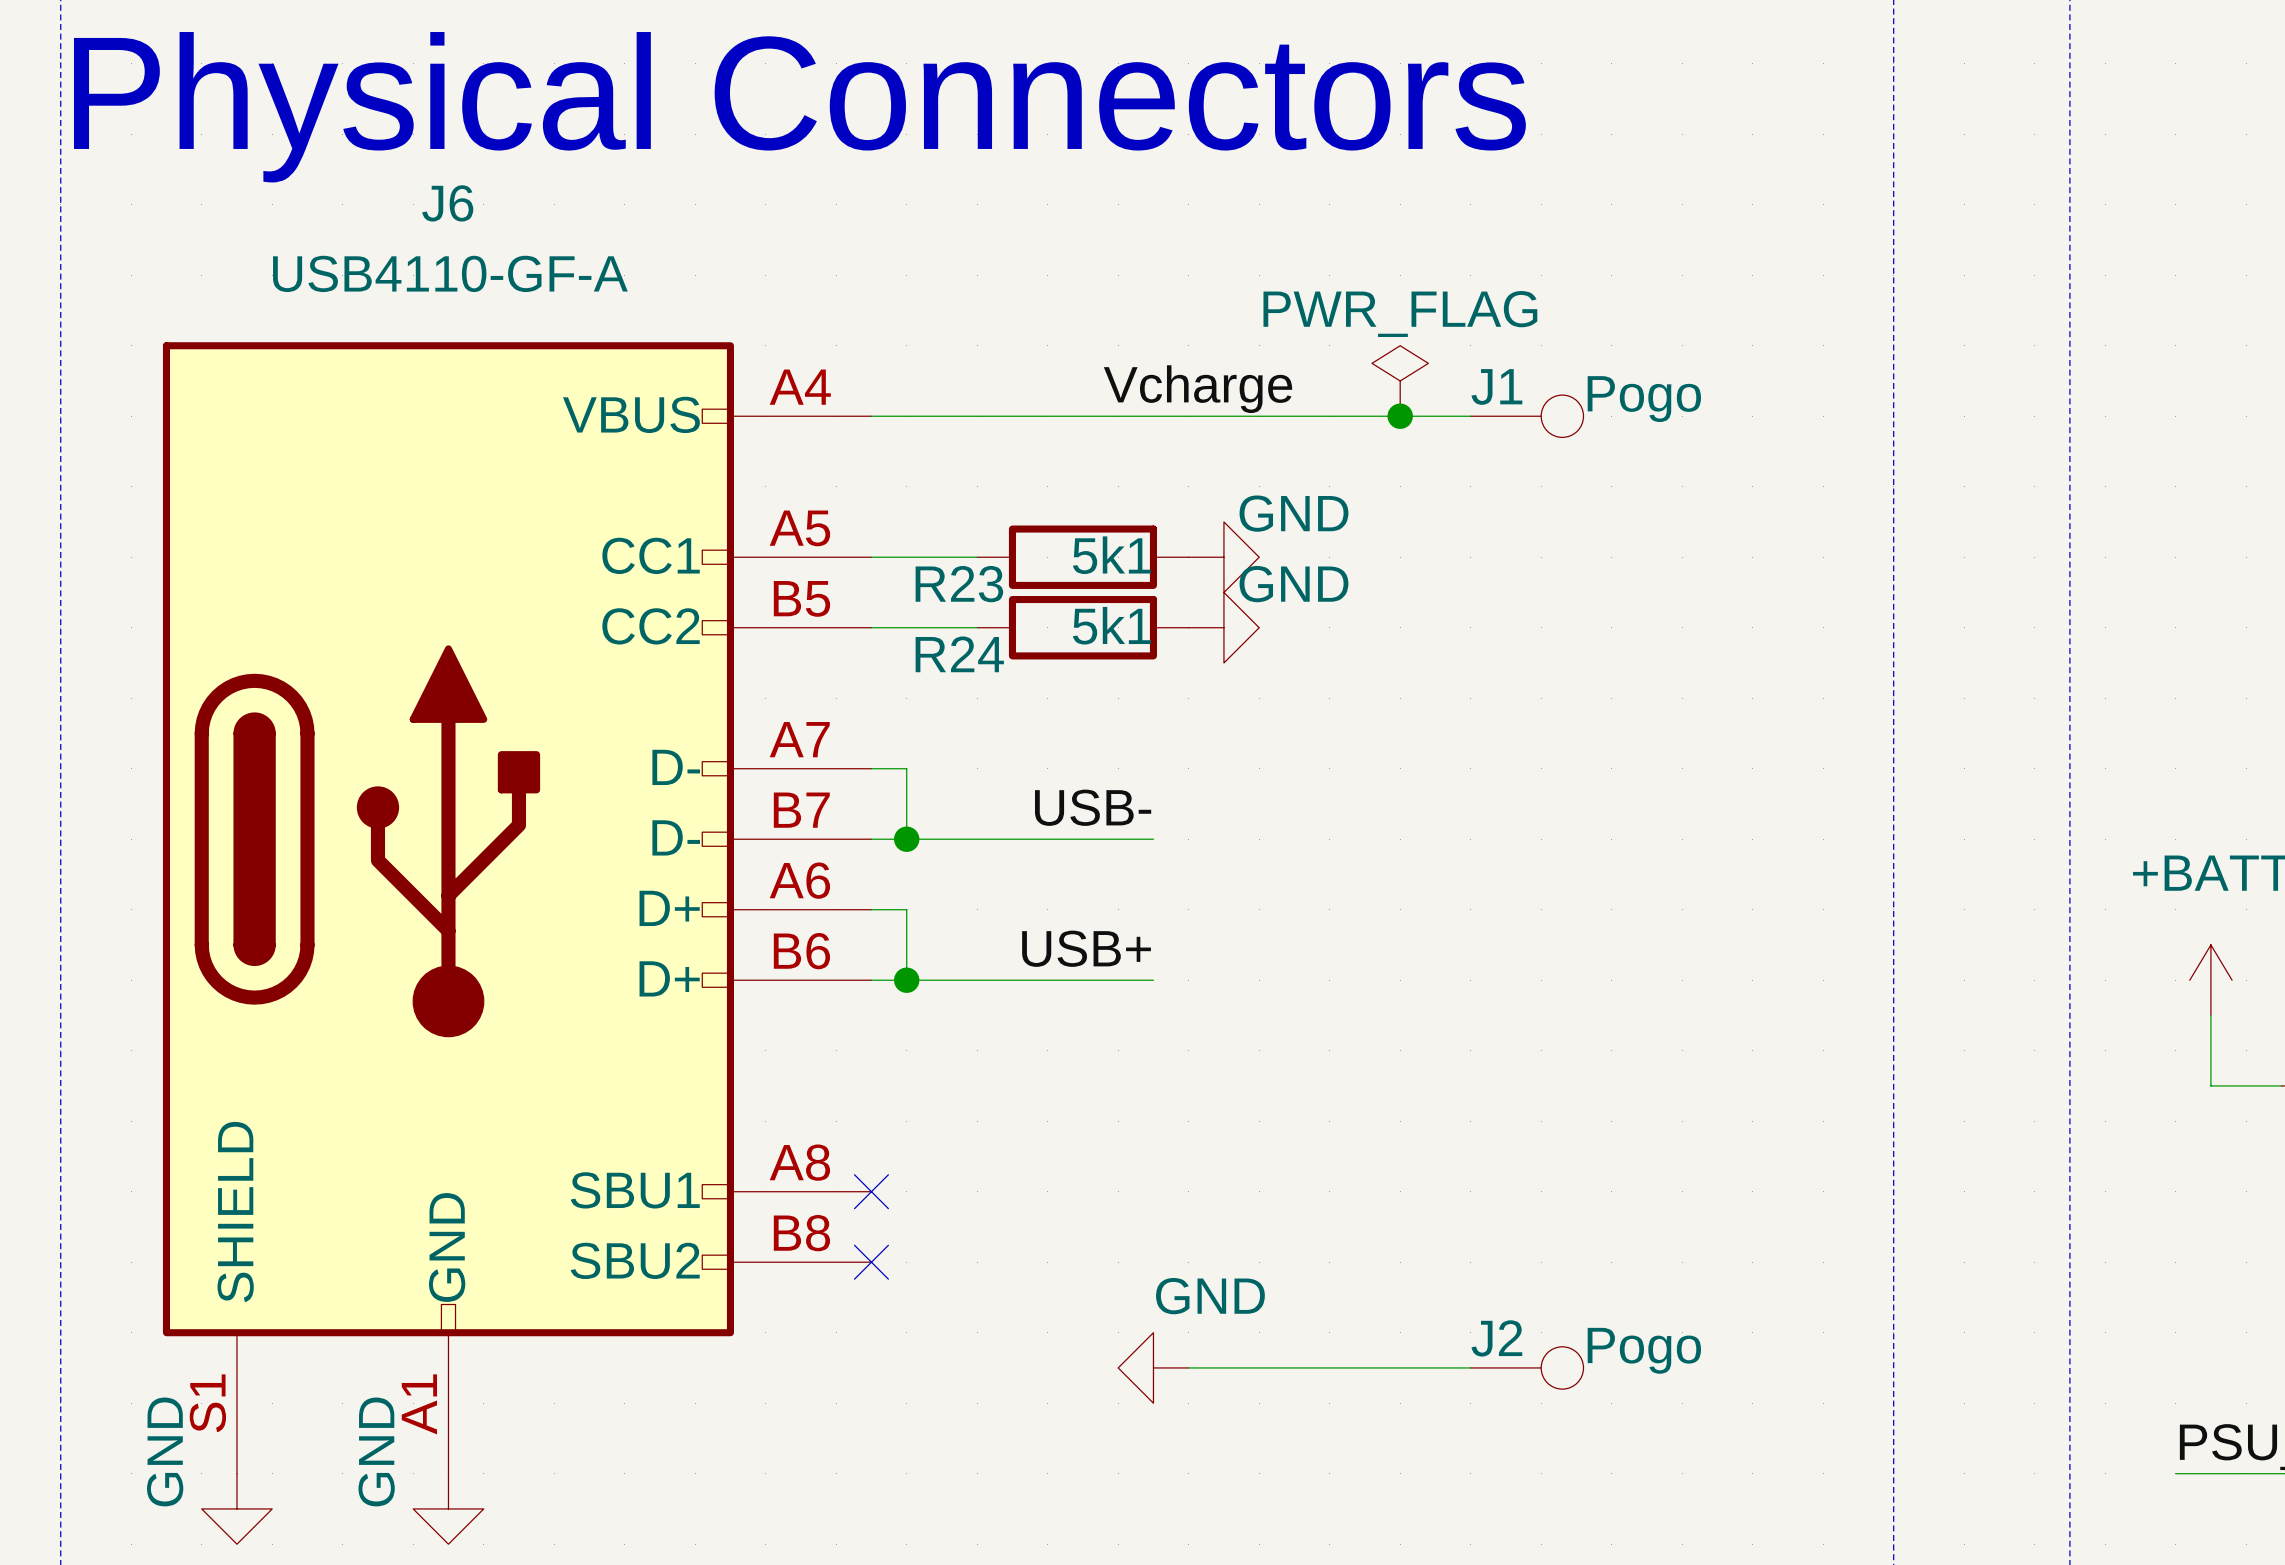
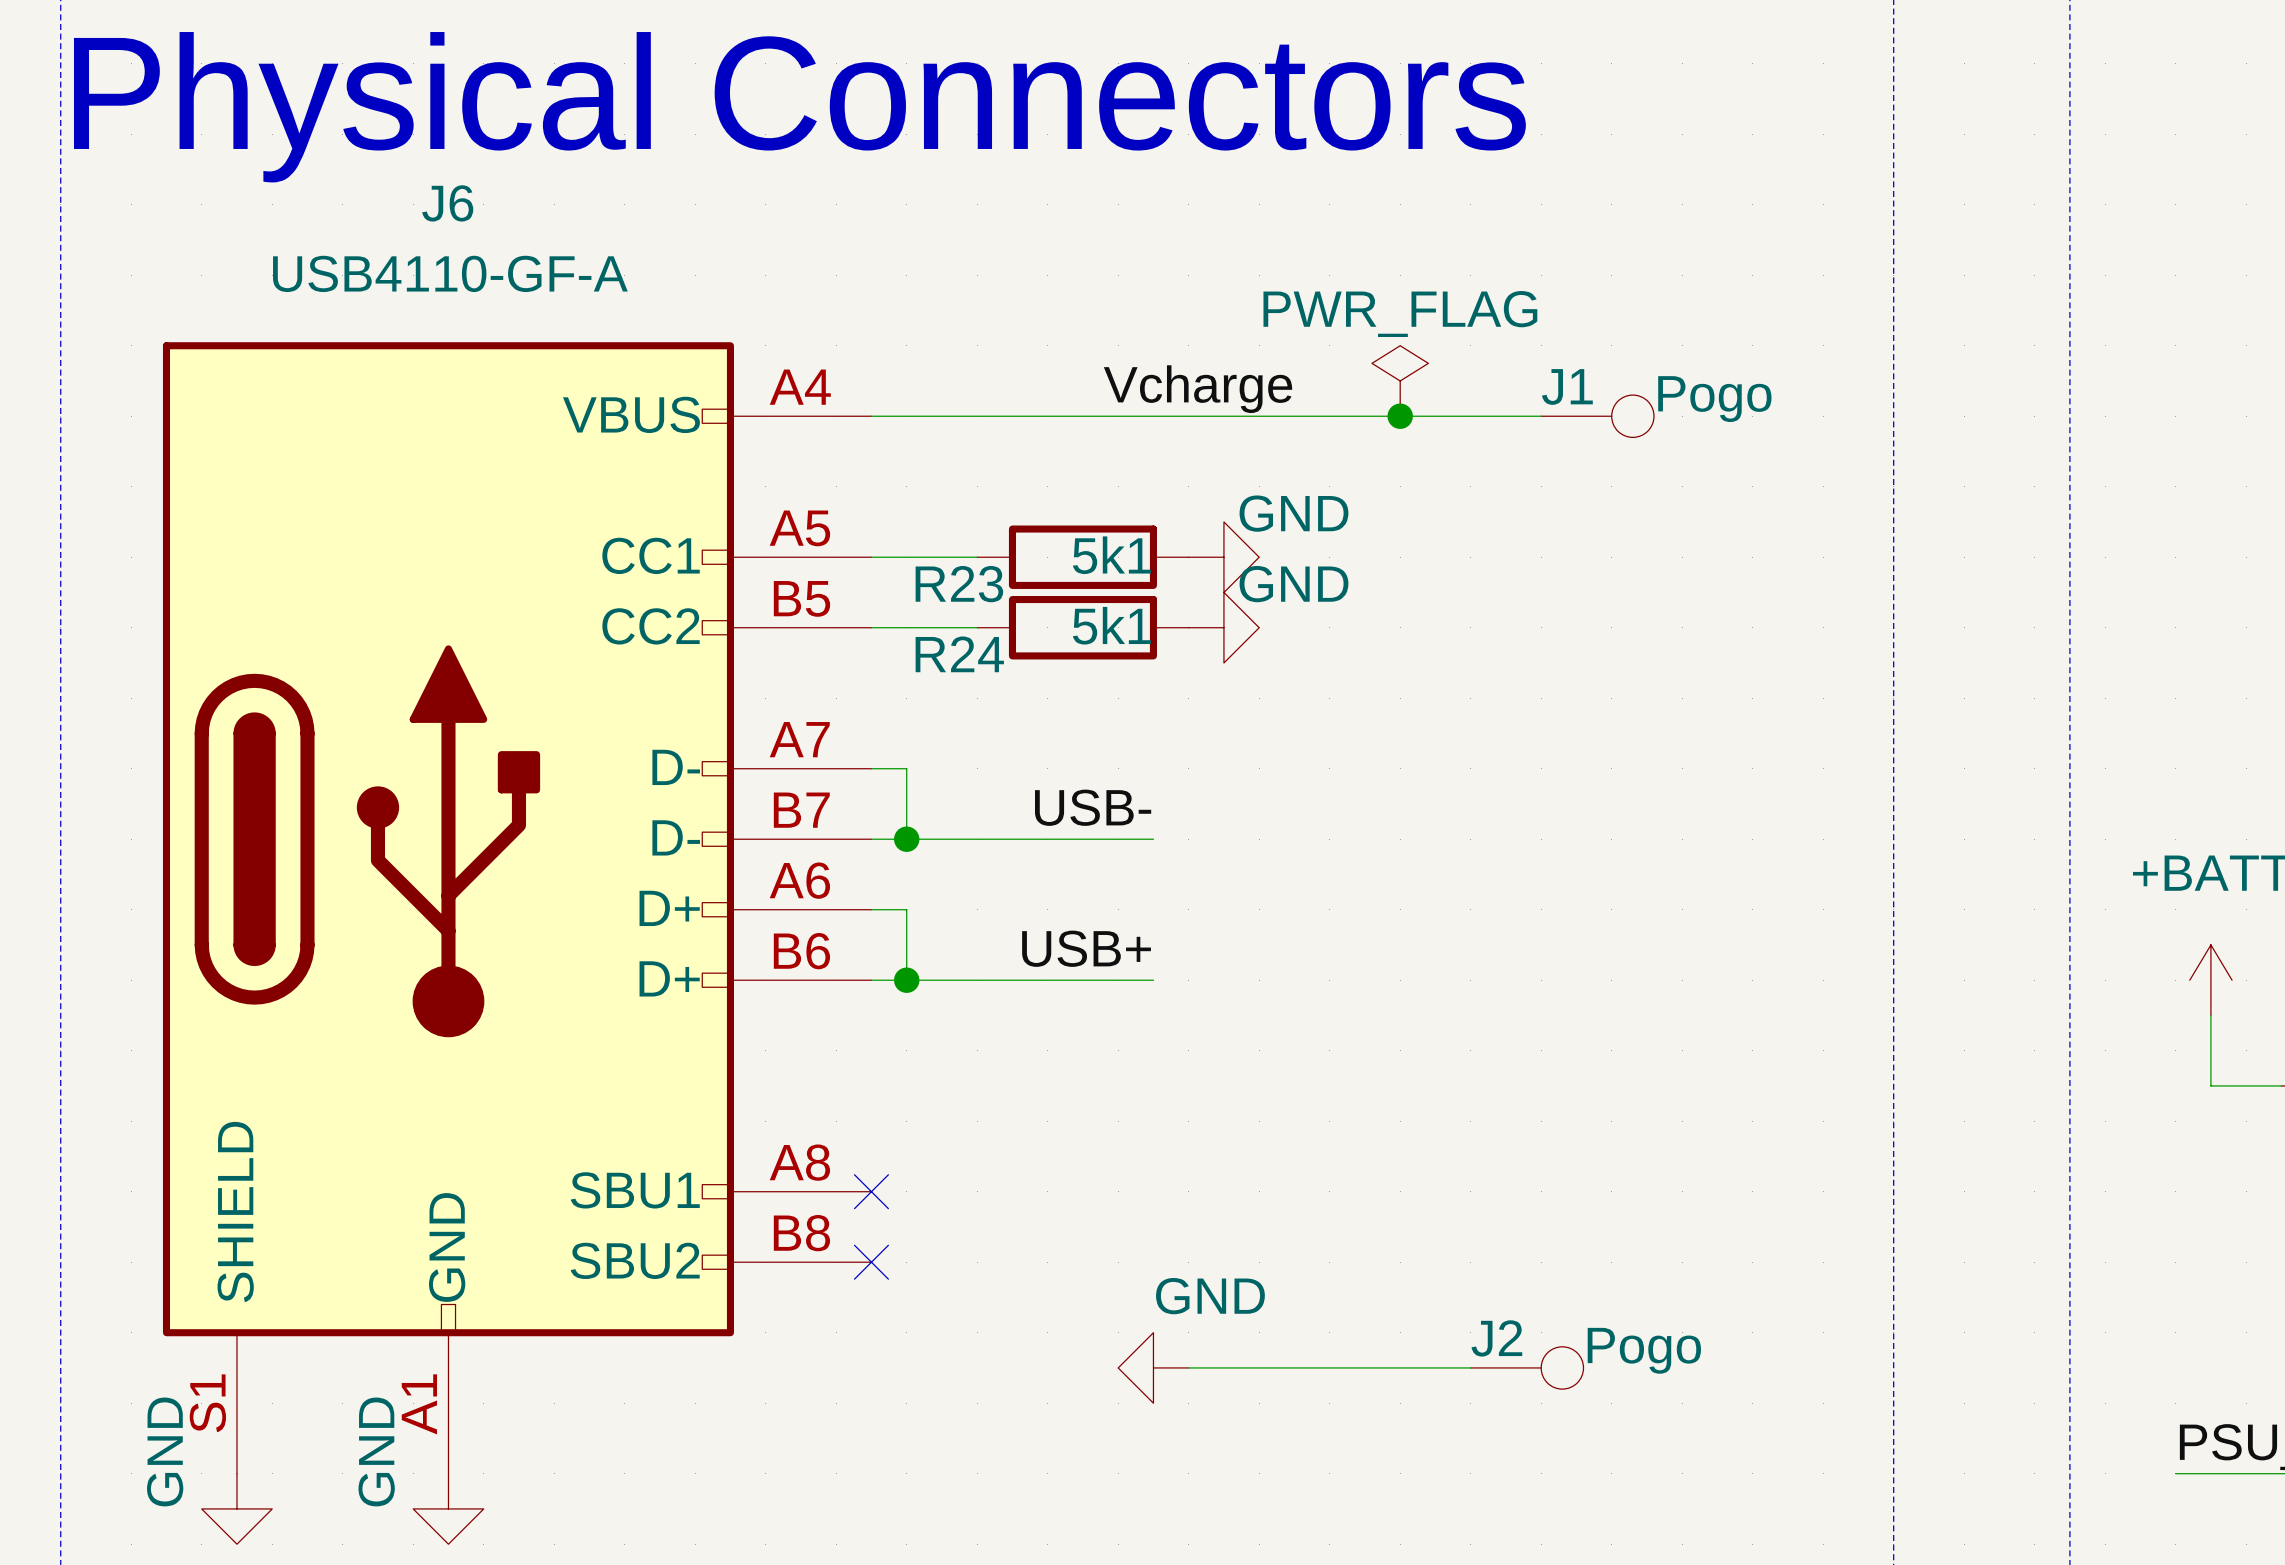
J1 position: (1527, 416) -> (1597, 416)

